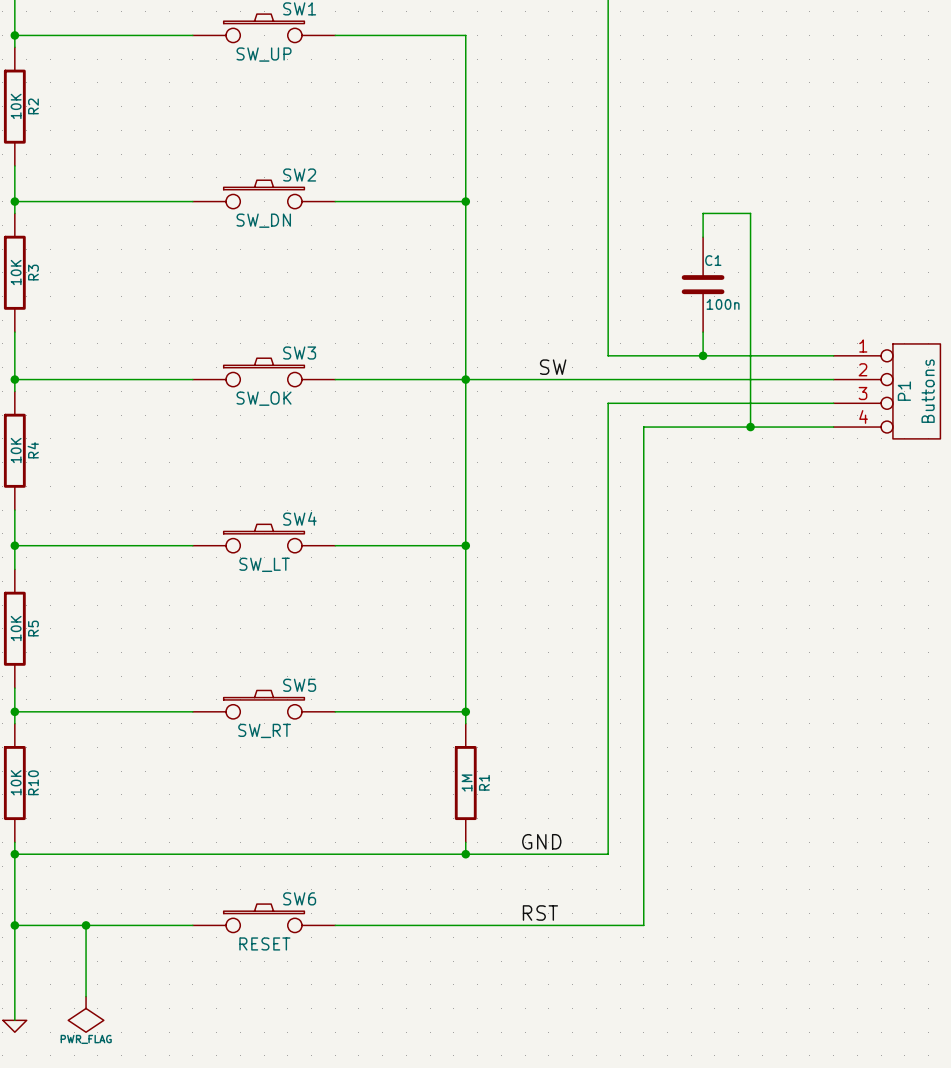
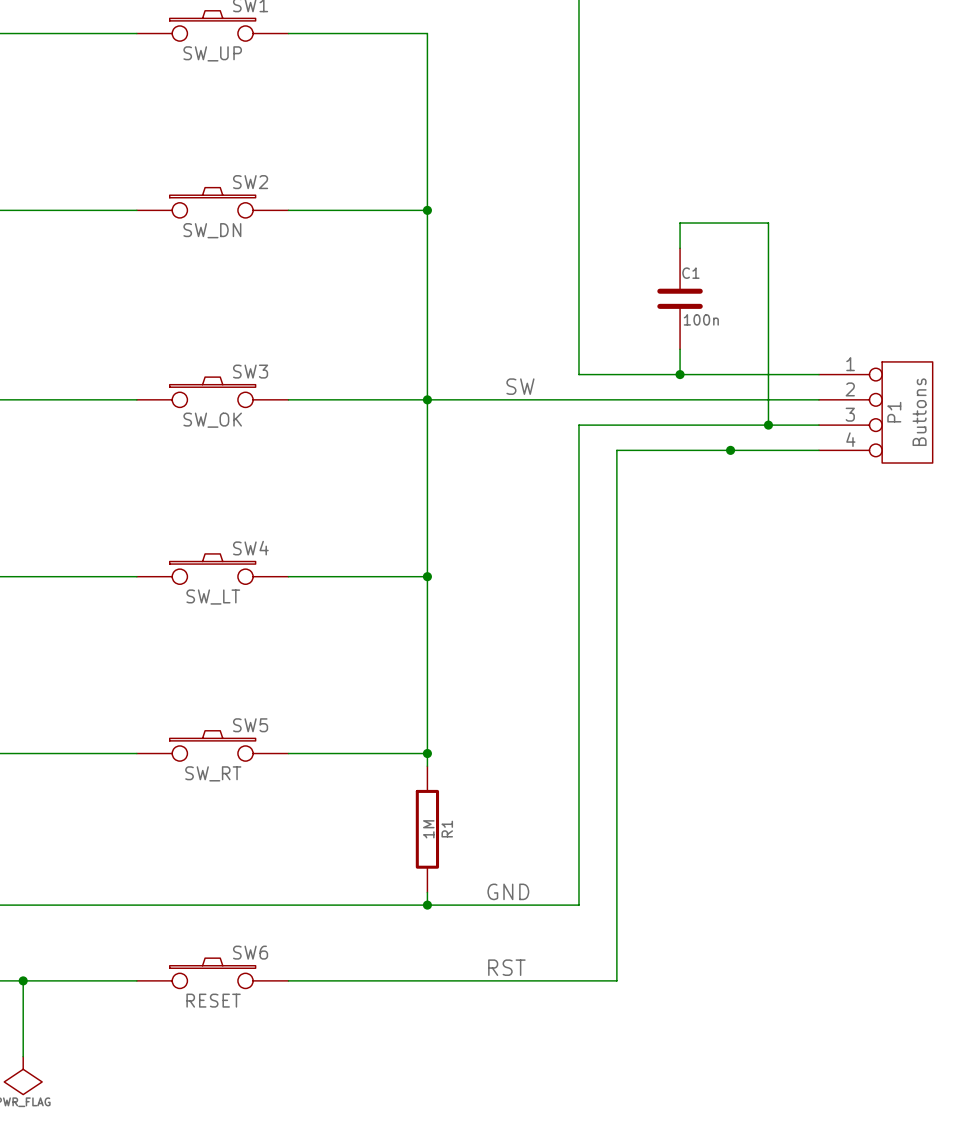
wire: (750, 213) (750, 427) -> (730, 223) (768, 223) (768, 425)
junction: none -> (768, 425)

